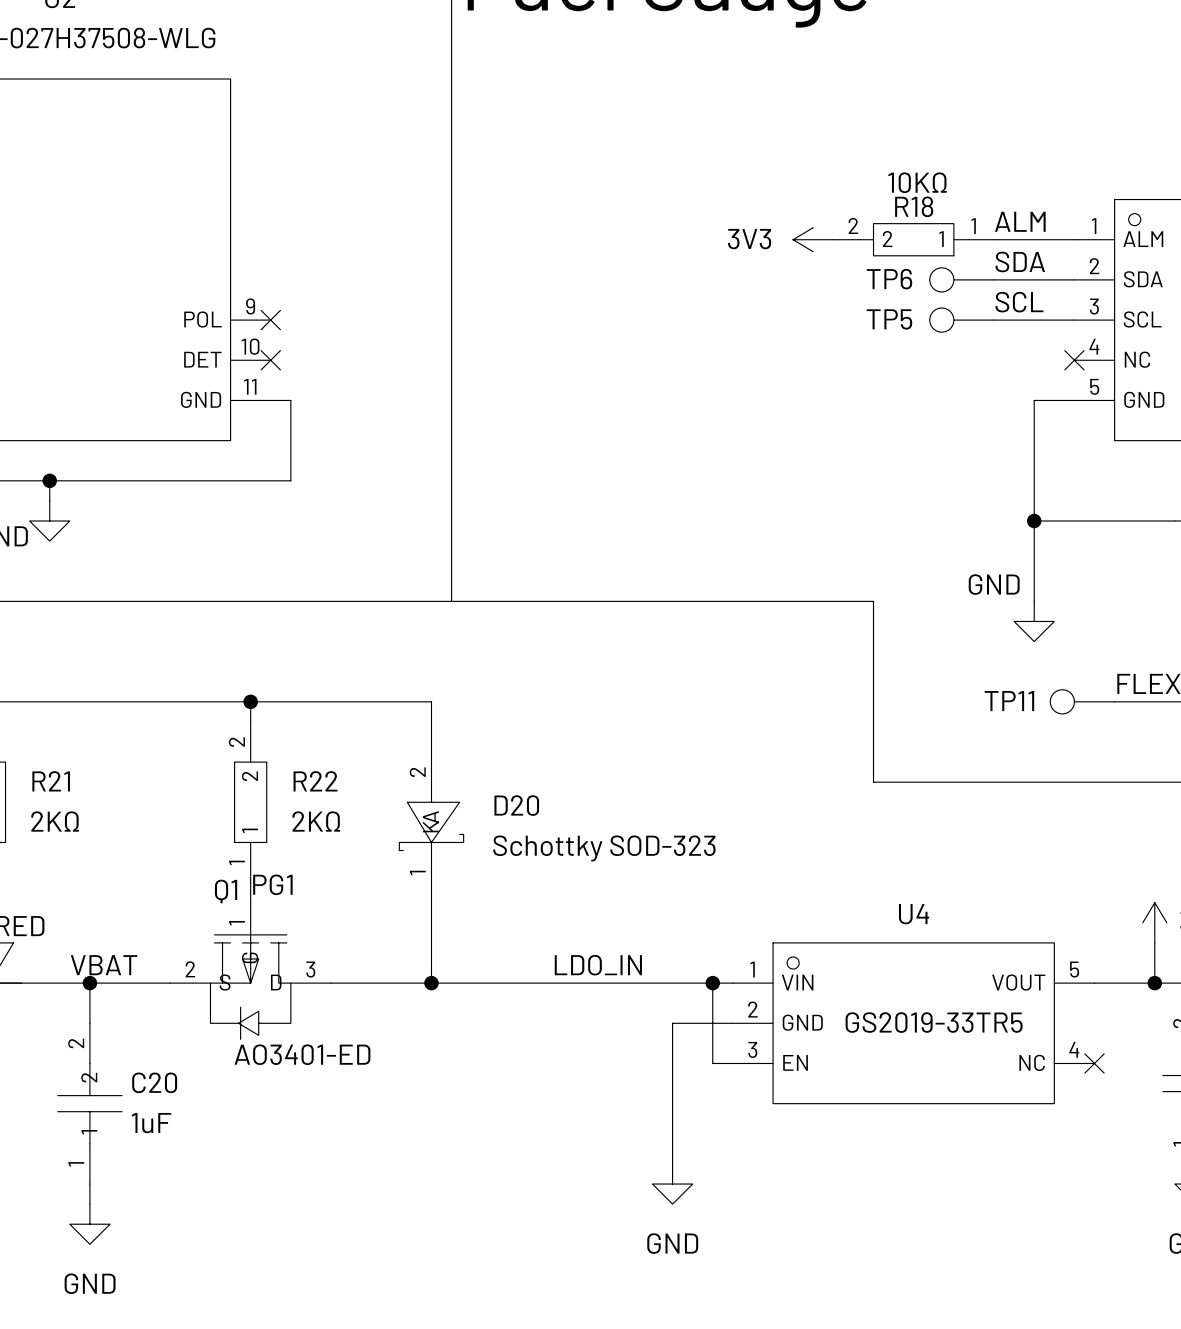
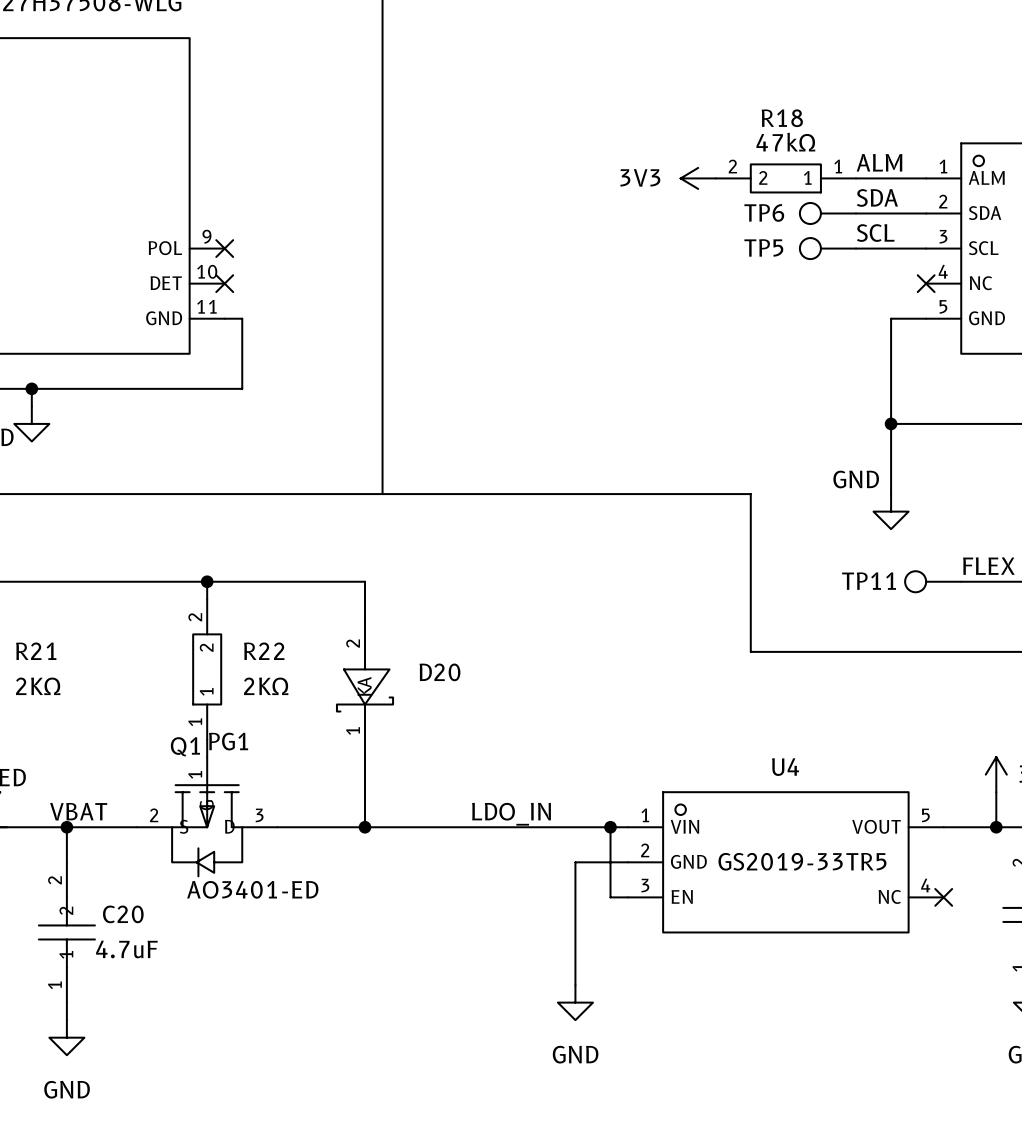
R18 value: 10KΩ (917, 182) -> 47kΩ (785, 142)
R18 name position: R18 (914, 206) -> R18 (782, 118)
D20 value: Schottky SOD-323 (604, 848) -> none
C20 value: 1uF (151, 1123) -> 4.7uF (126, 949)

